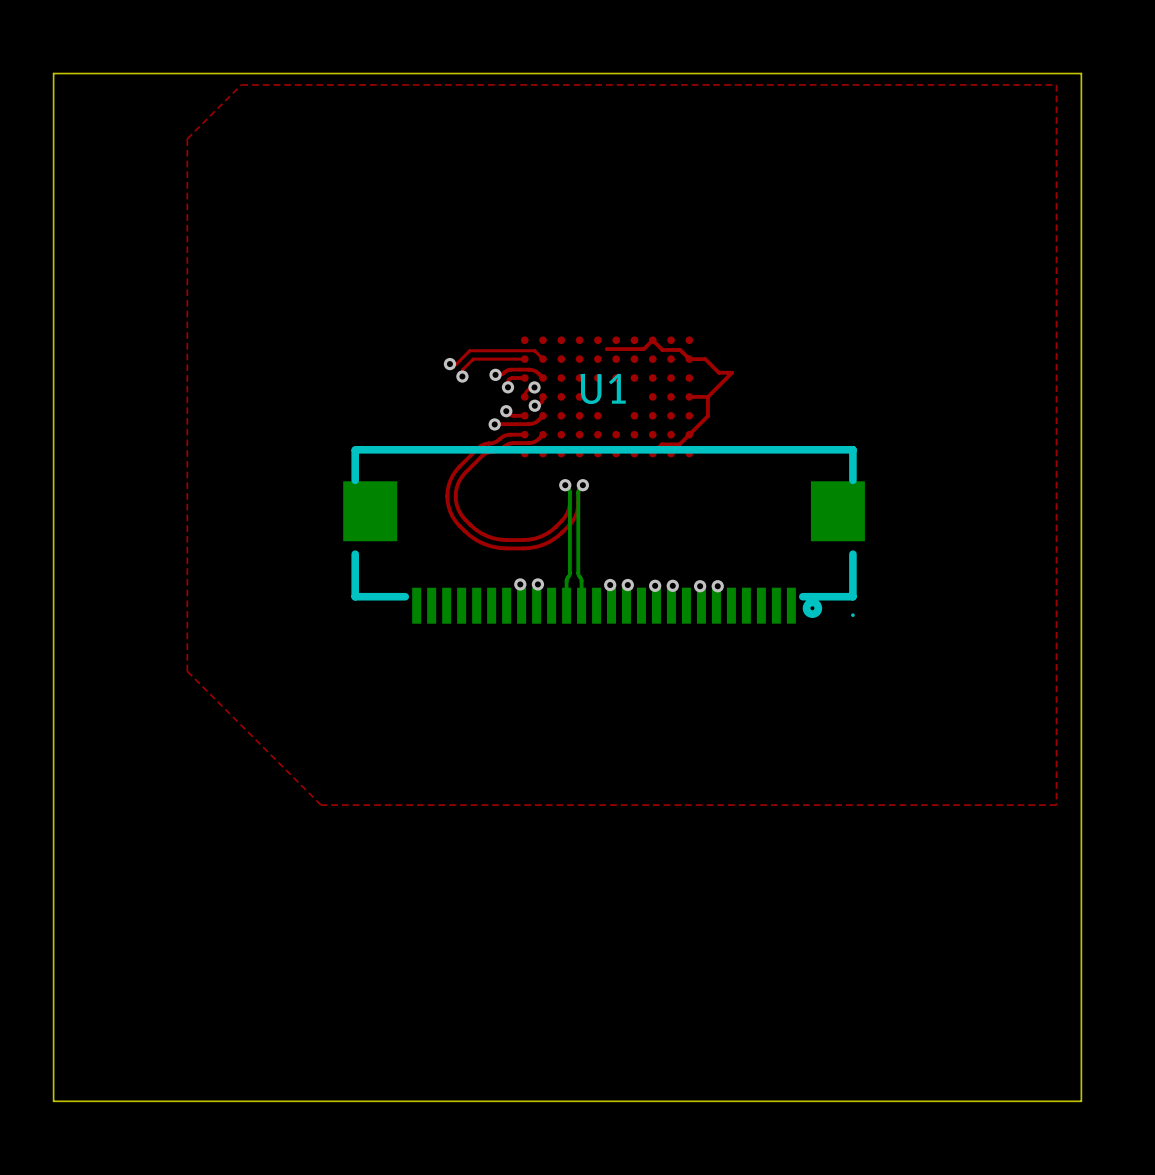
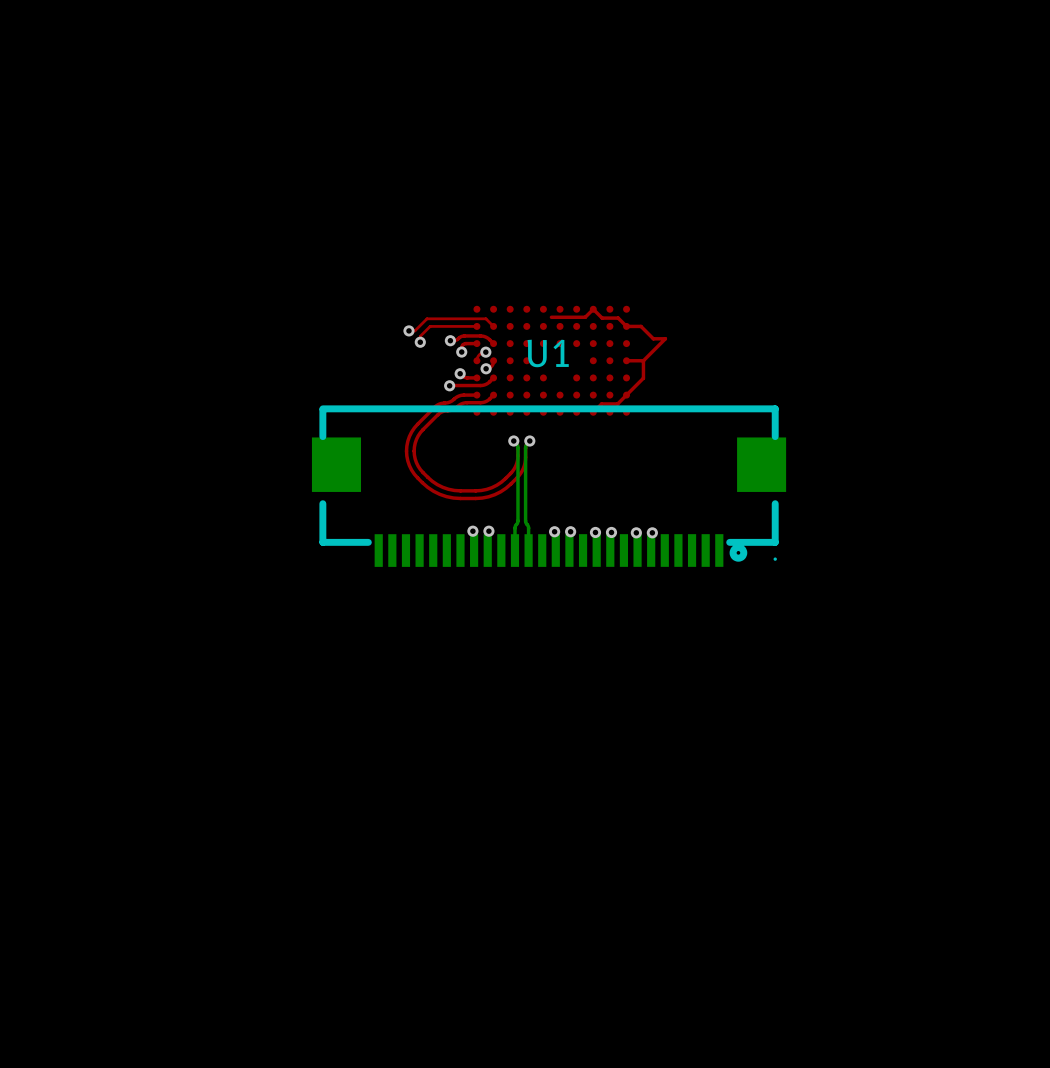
board edge: (1081, 73) (53, 73) (53, 1101) (1081, 1101) (1081, 73) -> none
top zone outline: (1056, 84) (1056, 805) (321, 805) (187, 671) (187, 138) (241, 84) (1056, 84) -> none

